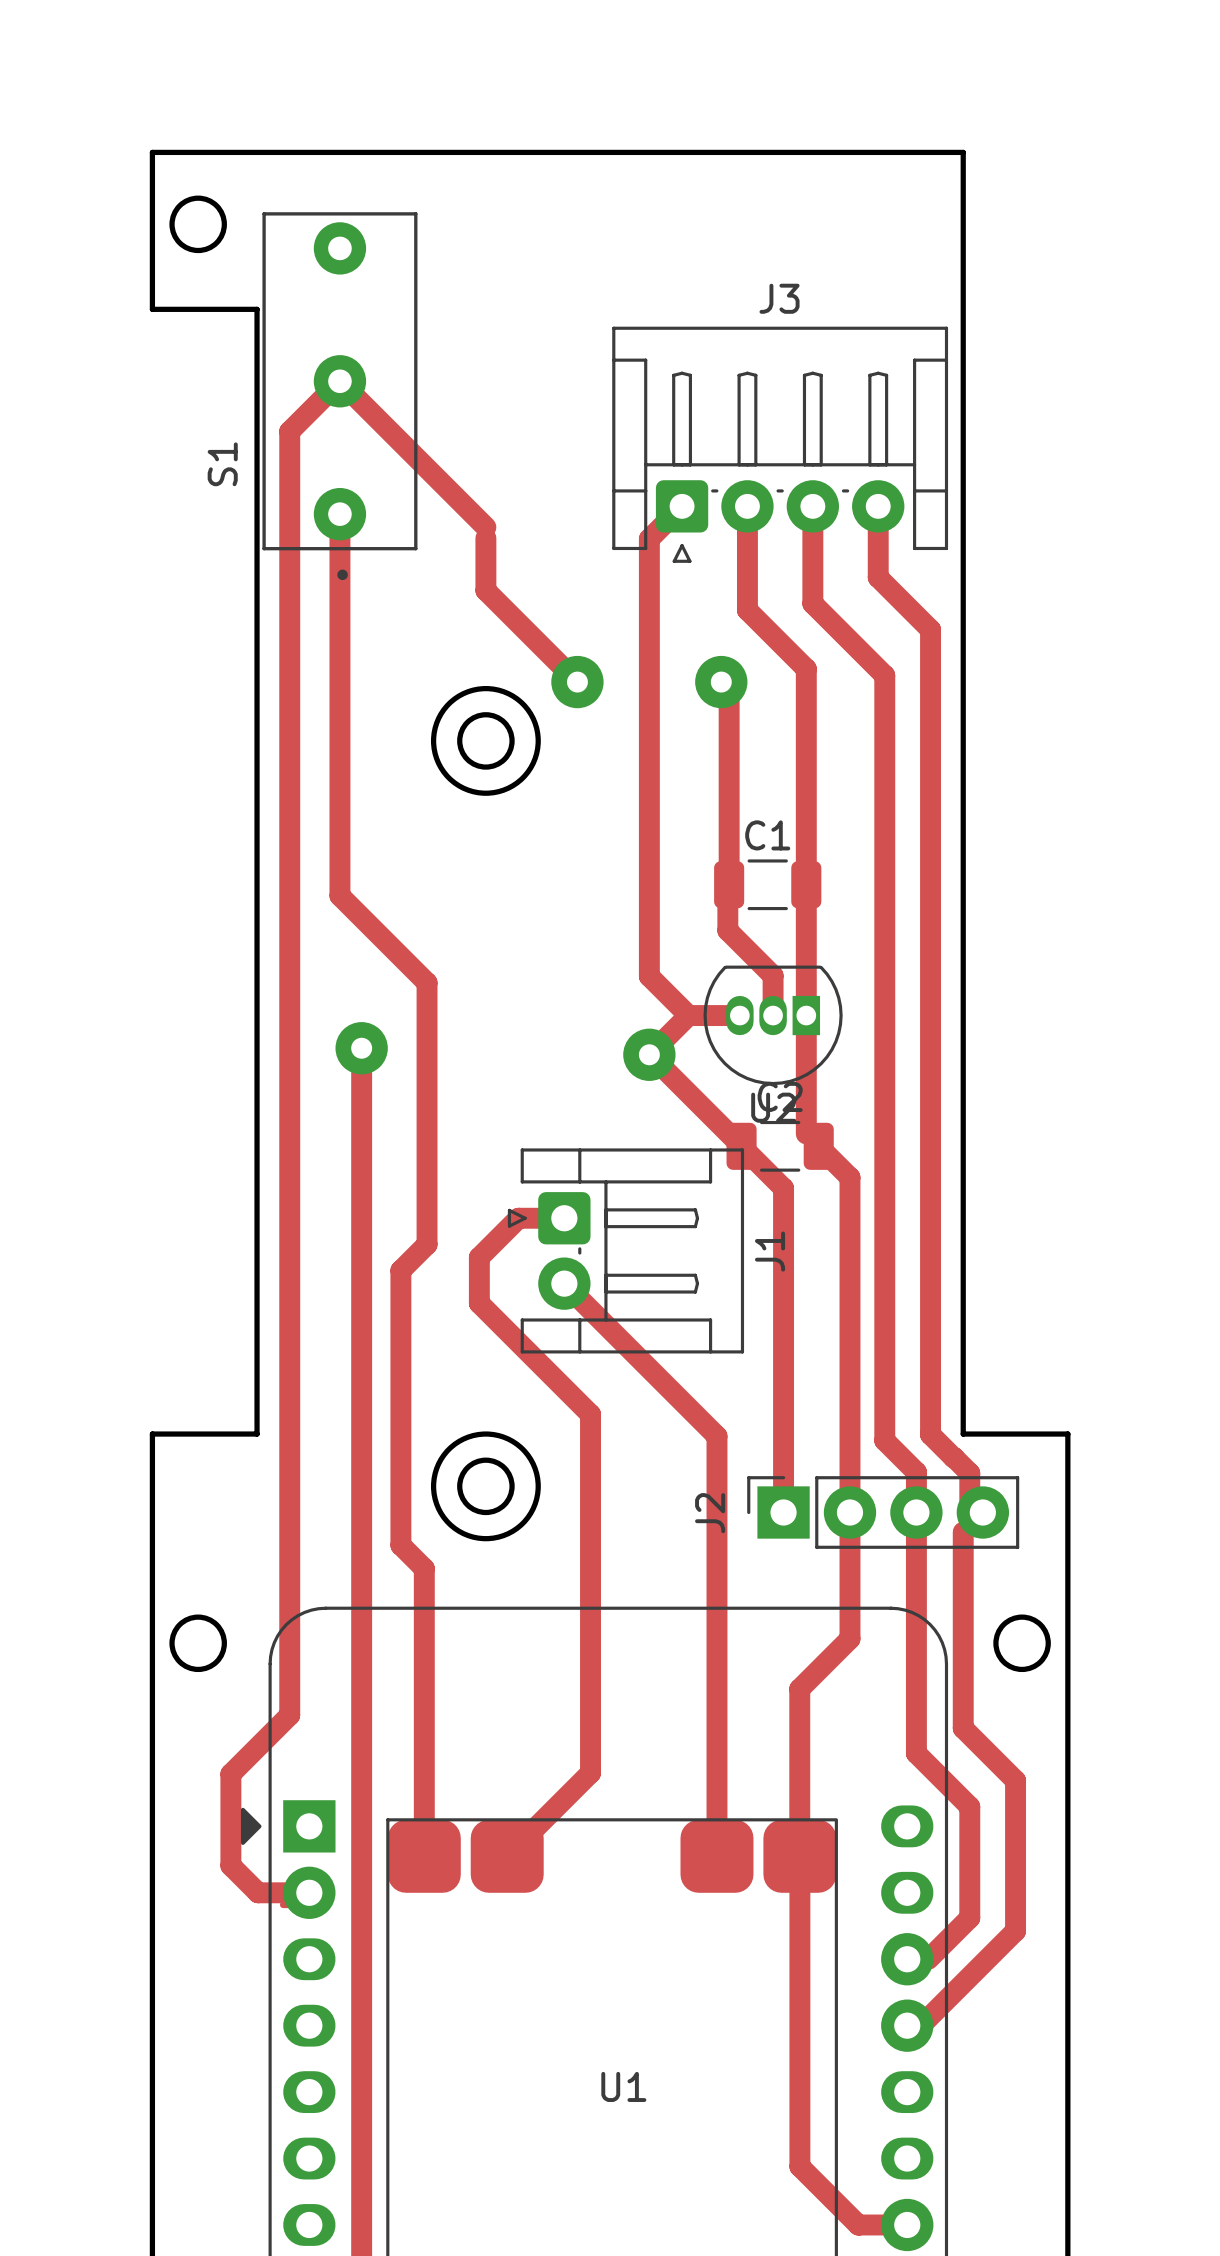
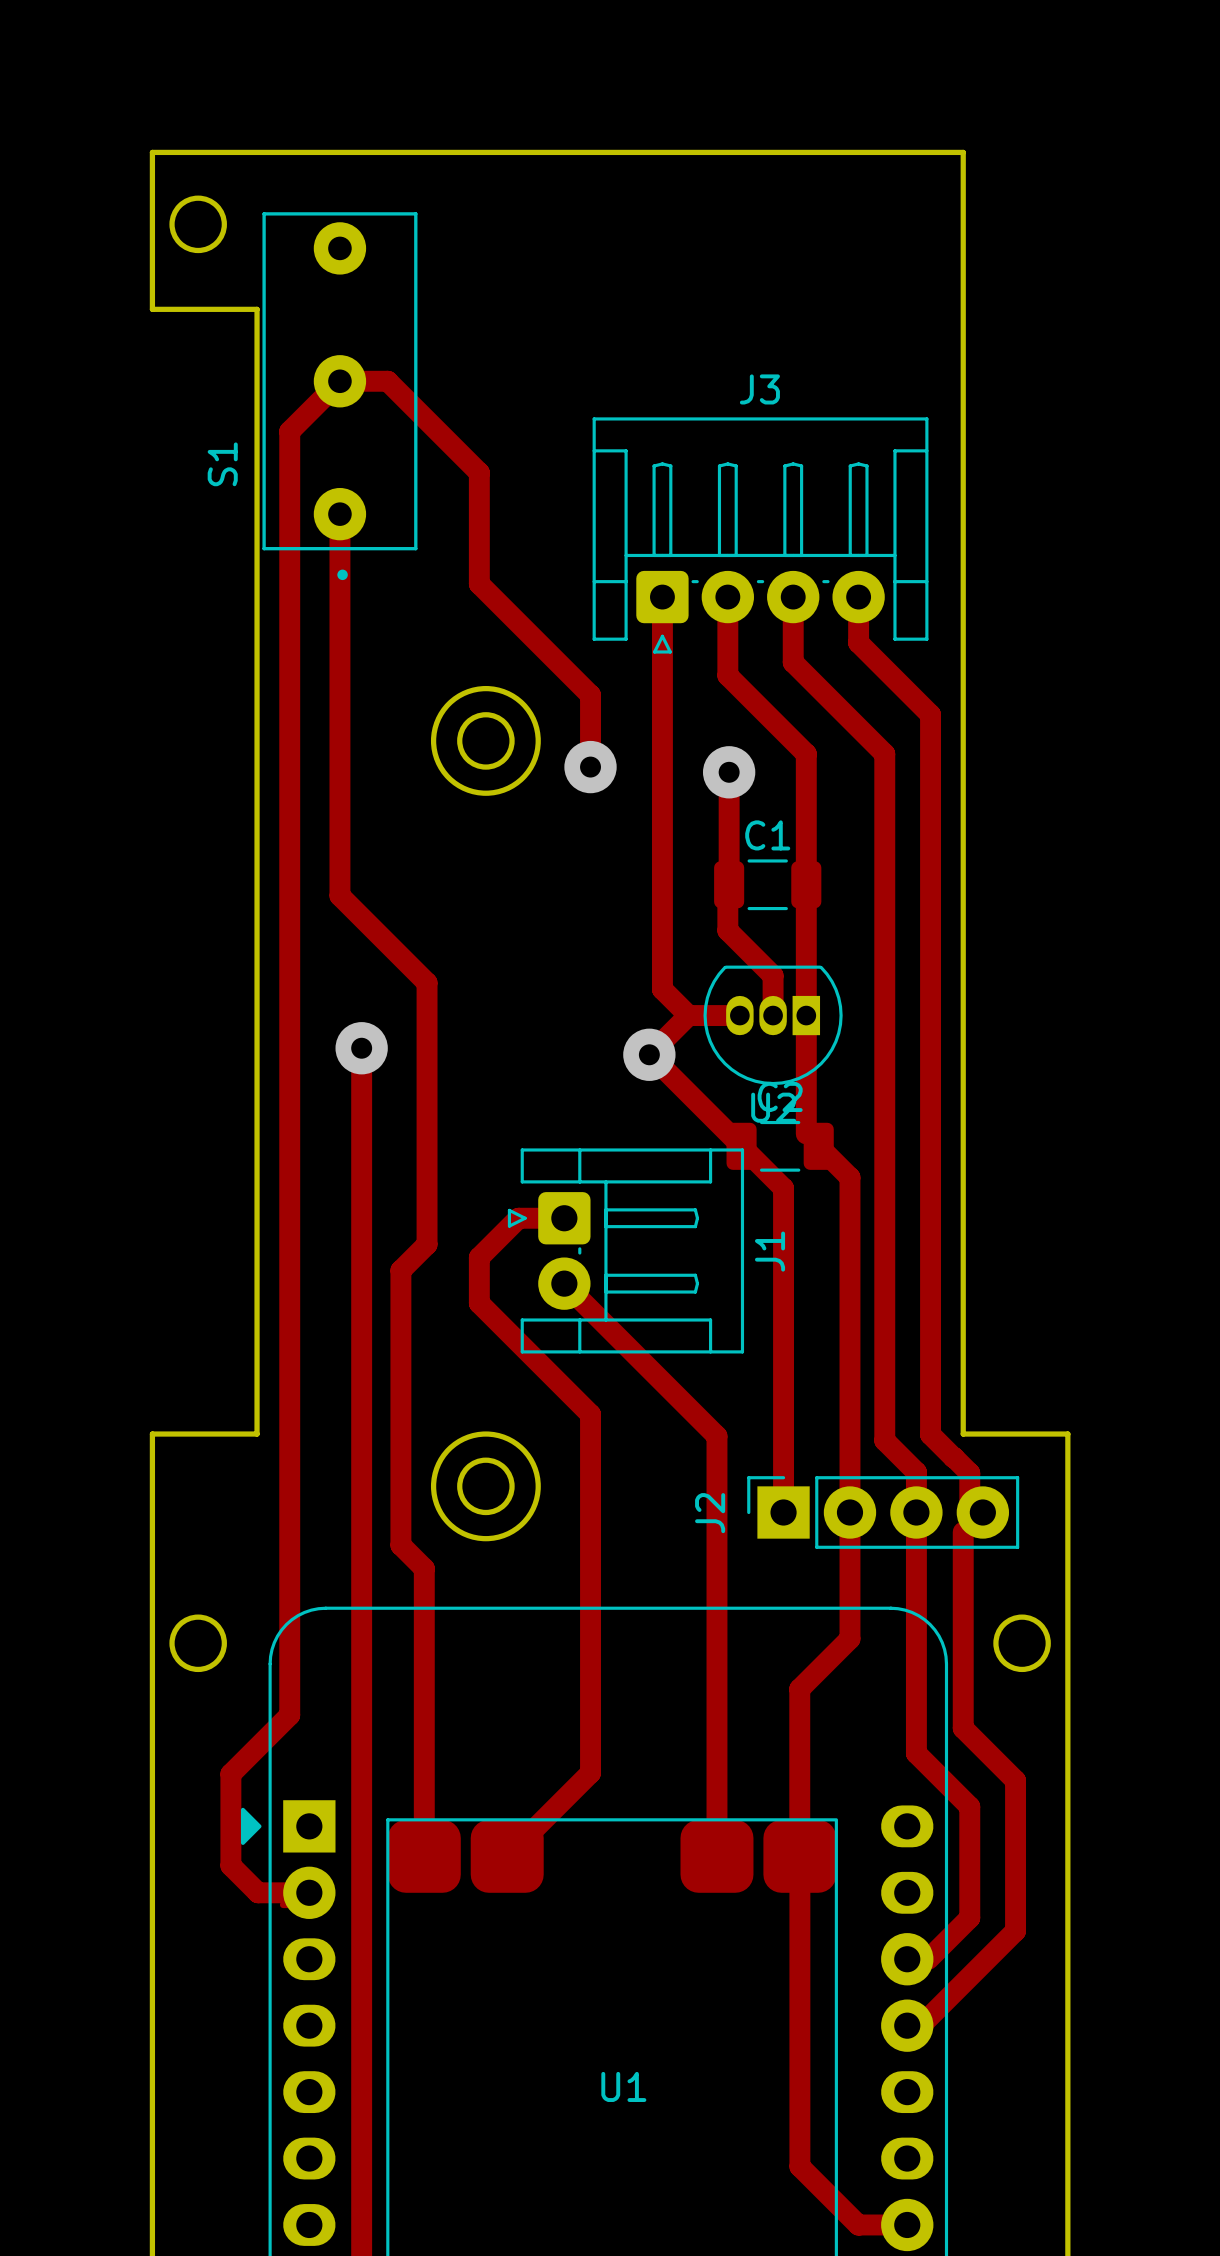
track: (339, 381) (485, 527) (485, 590) -> (339, 381) (387, 381) (479, 472) (479, 583) (485, 590)
J3 position: (780, 444) -> (760, 535)
track: (682, 506) (649, 539) (649, 976) (662, 989) -> (662, 597) (662, 989)
track: (747, 506) (747, 610) (806, 668) (806, 753) -> (727, 597) (727, 675) (806, 753)
track: (812, 506) (812, 603) (884, 675) (884, 753) -> (793, 597) (793, 662) (884, 753)
track: (878, 506) (878, 577) (930, 629) (930, 714) -> (858, 597) (858, 642) (930, 714)
track: none -> (577, 682) (590, 695) (590, 767)
via: (577, 682) -> none
track: (721, 682) (729, 689) (729, 772) -> none
via: (721, 682) -> none
via: none -> (590, 767)
via: none -> (729, 772)

